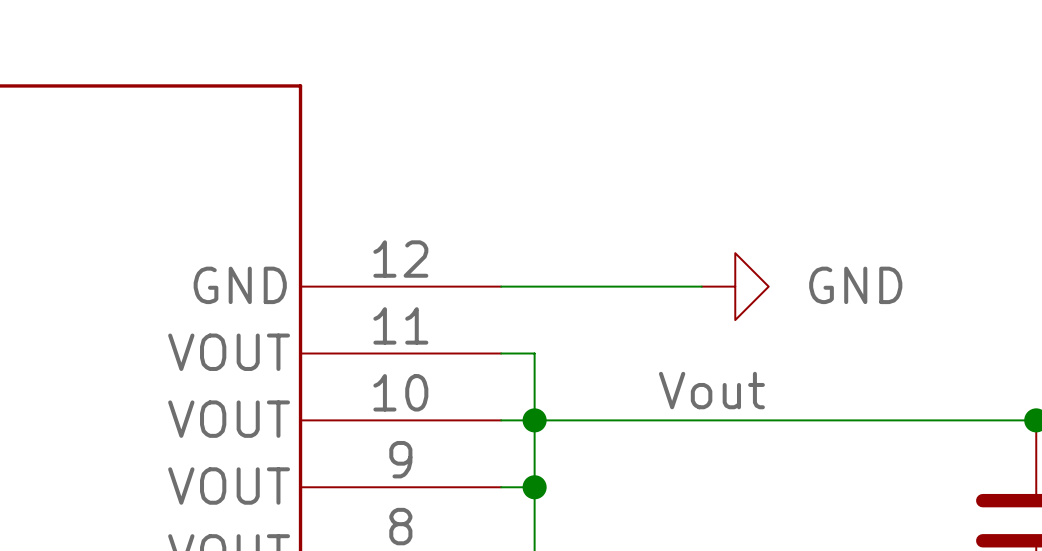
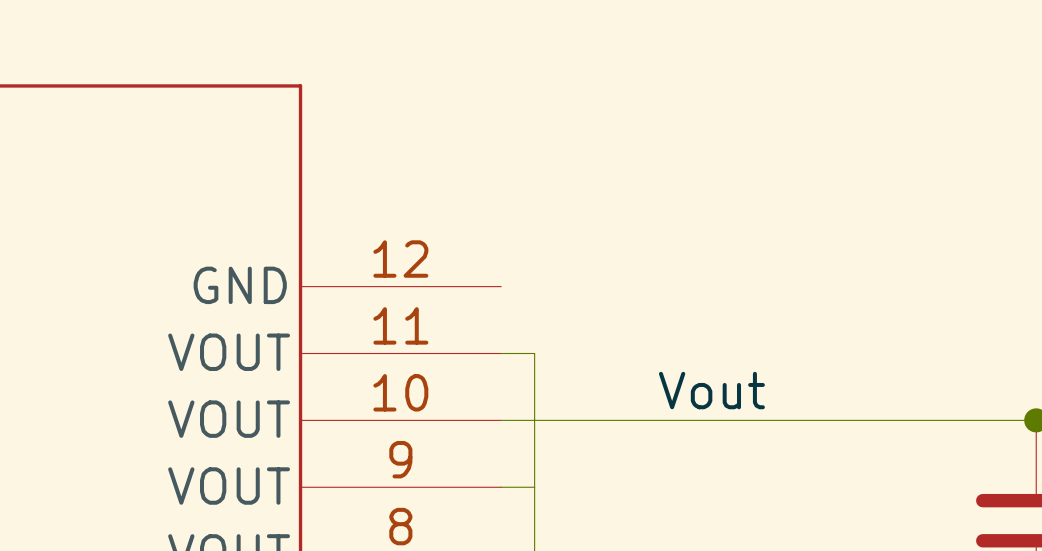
wire: (501, 286) (701, 286) -> none
power symbol: GND (735, 286) -> none
junction: (534, 420) -> none
junction: (534, 487) -> none

